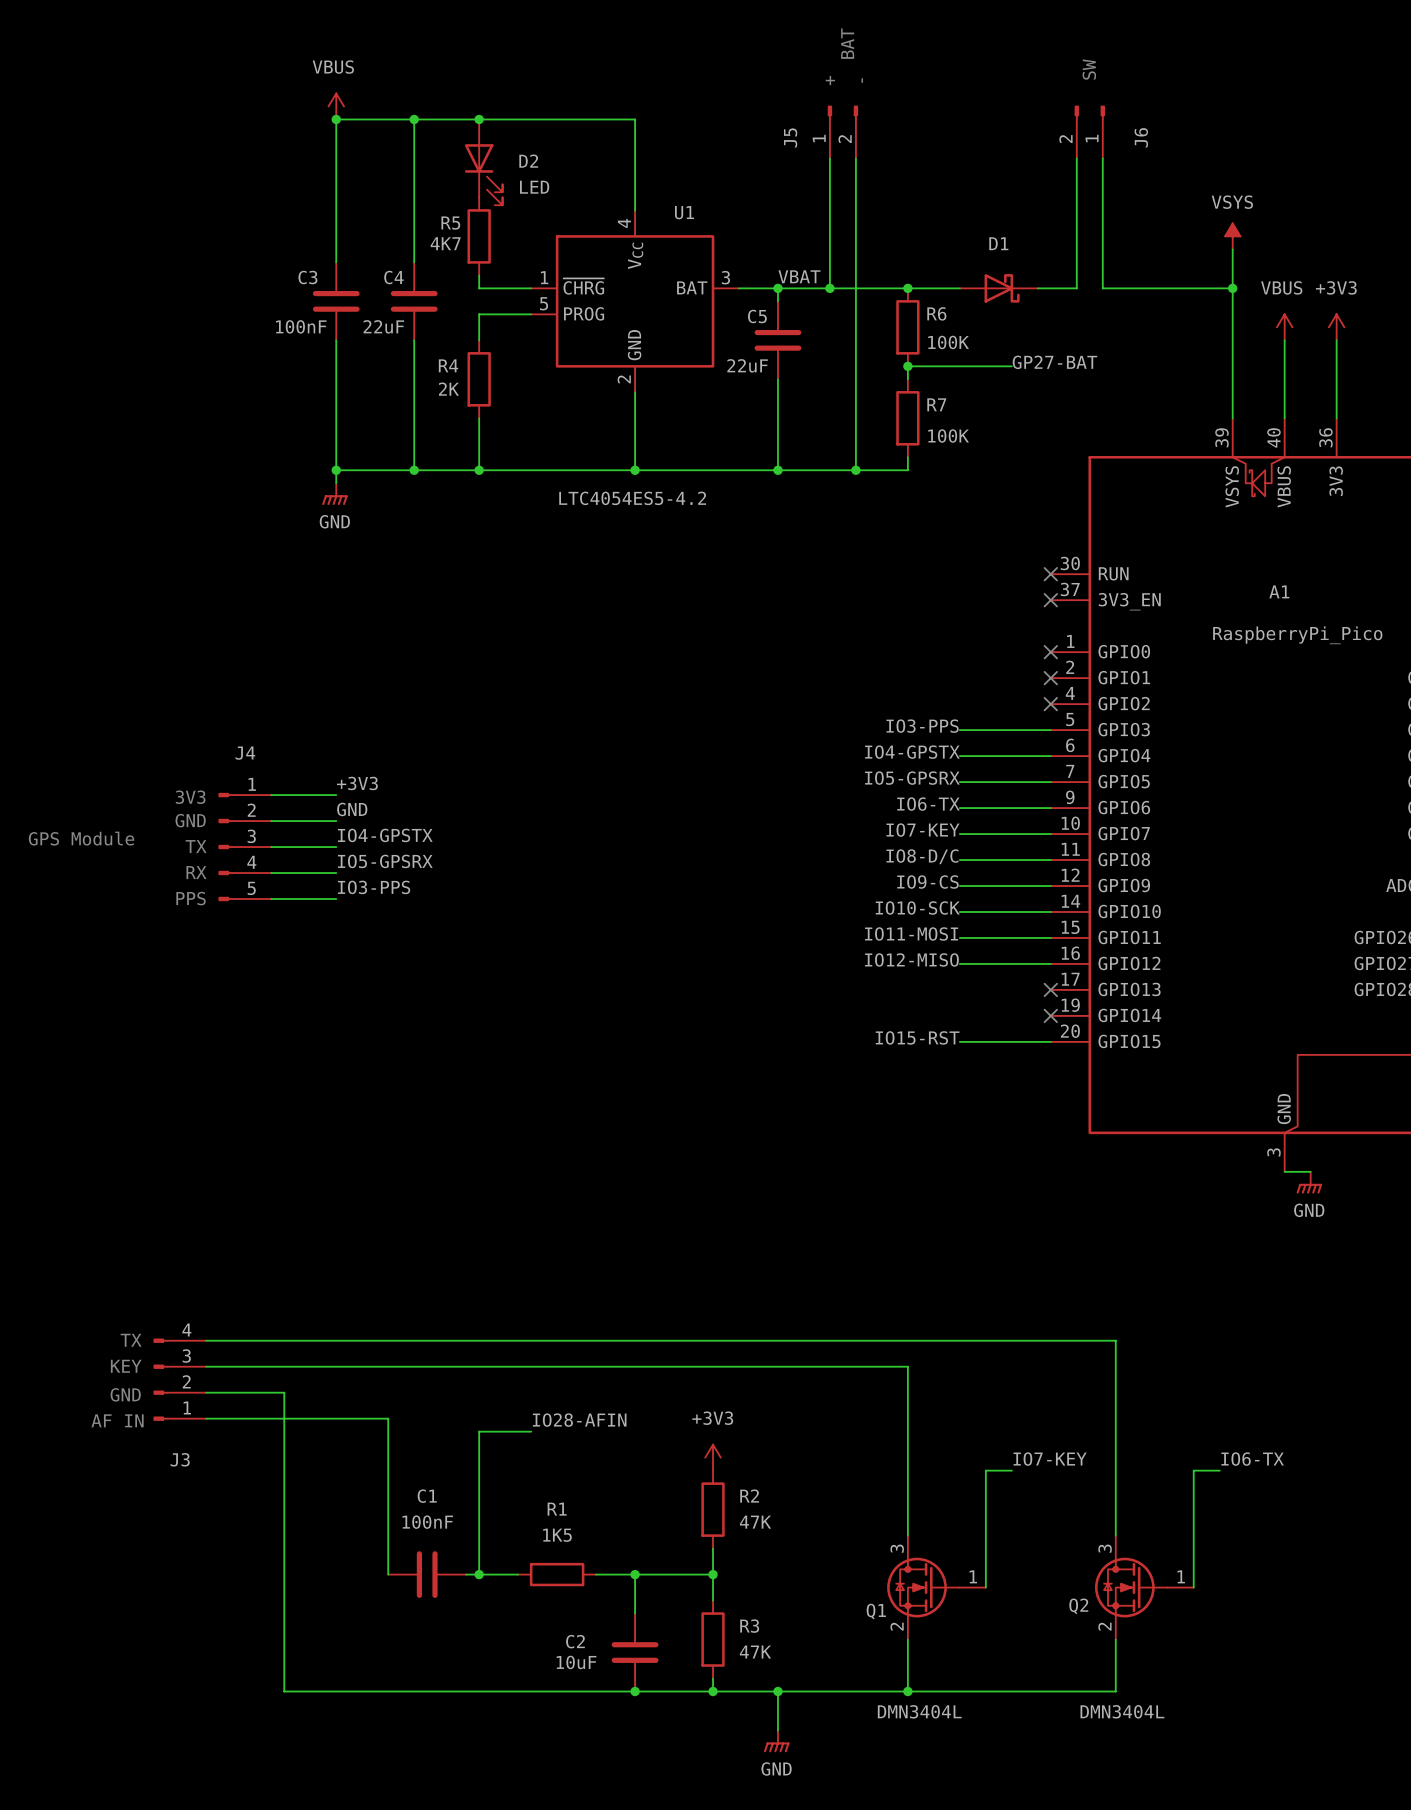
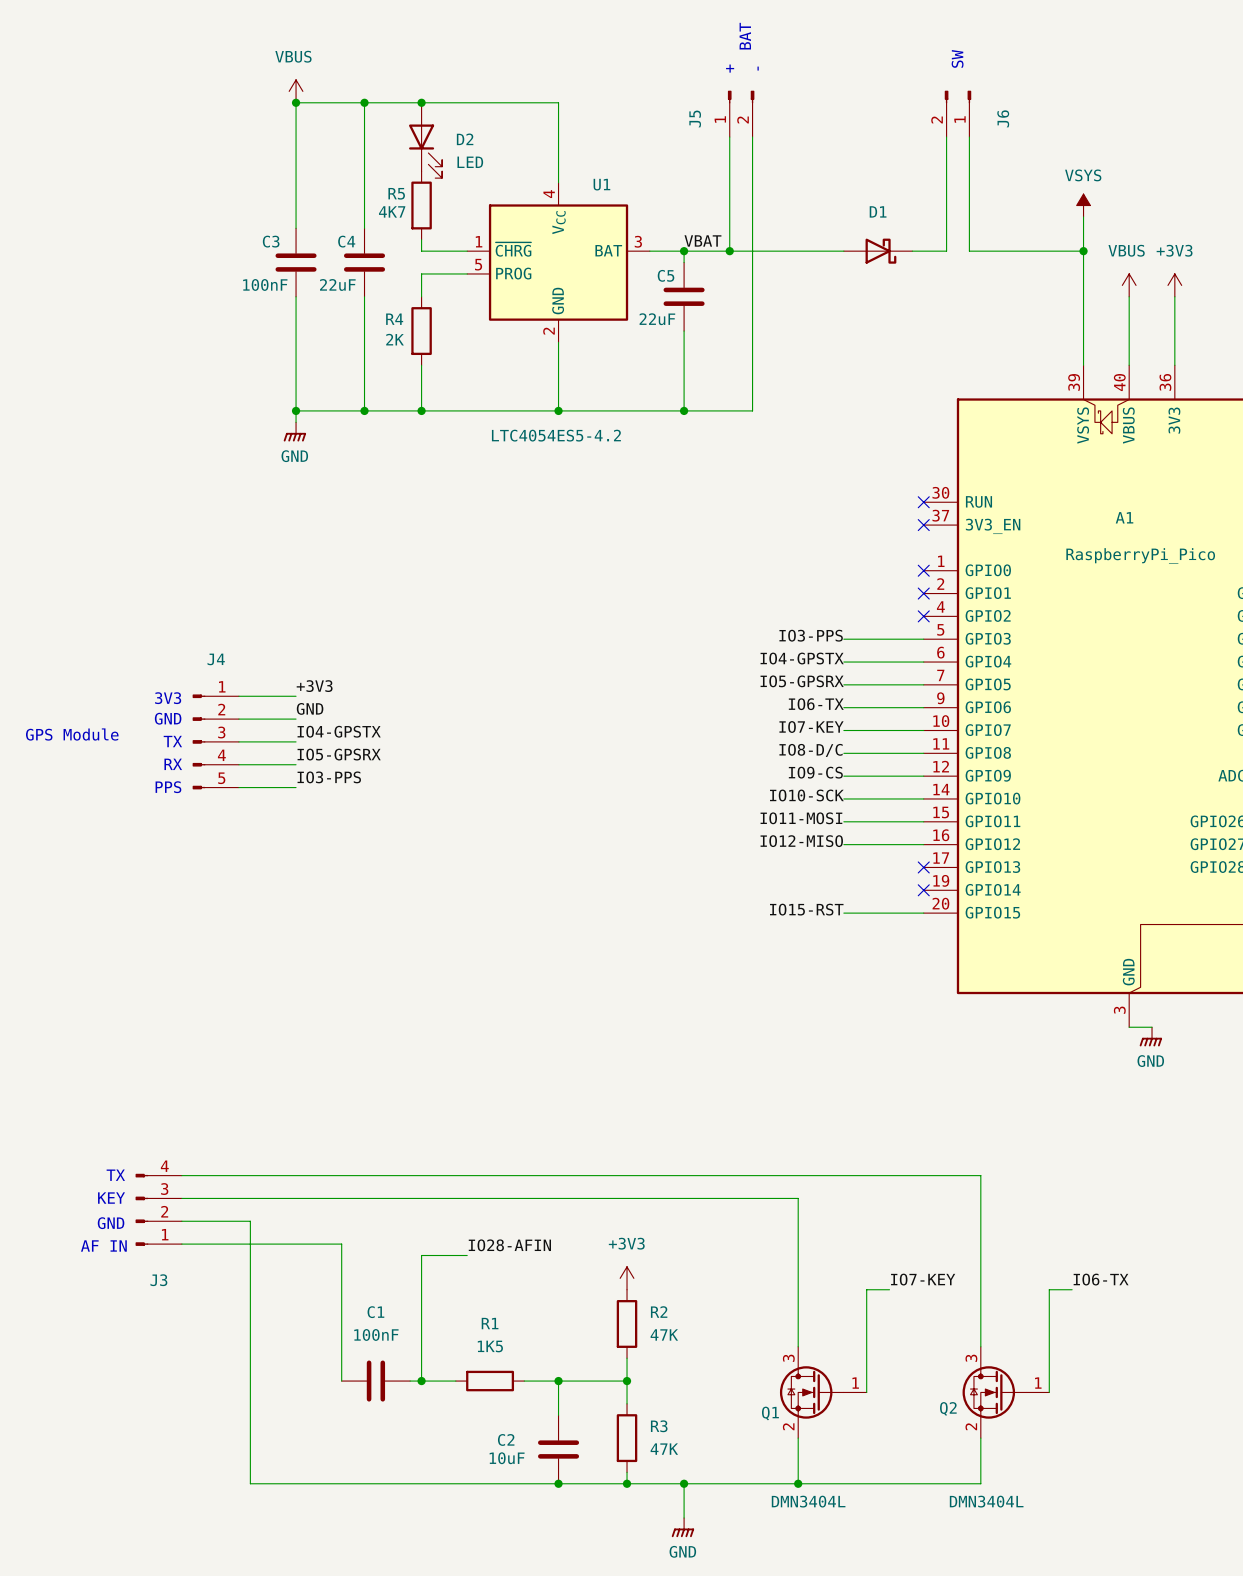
junction: (907, 288) -> none
R6: 100K (907, 327) -> none
label: GP27-BAT (1054, 362) -> none
junction: (907, 366) -> none
wire: (1011, 366) (907, 366) (907, 379) -> none
R7: 100K (907, 418) -> none
wire: (907, 457) (907, 470) (855, 470) -> none
junction: (855, 470) -> none

